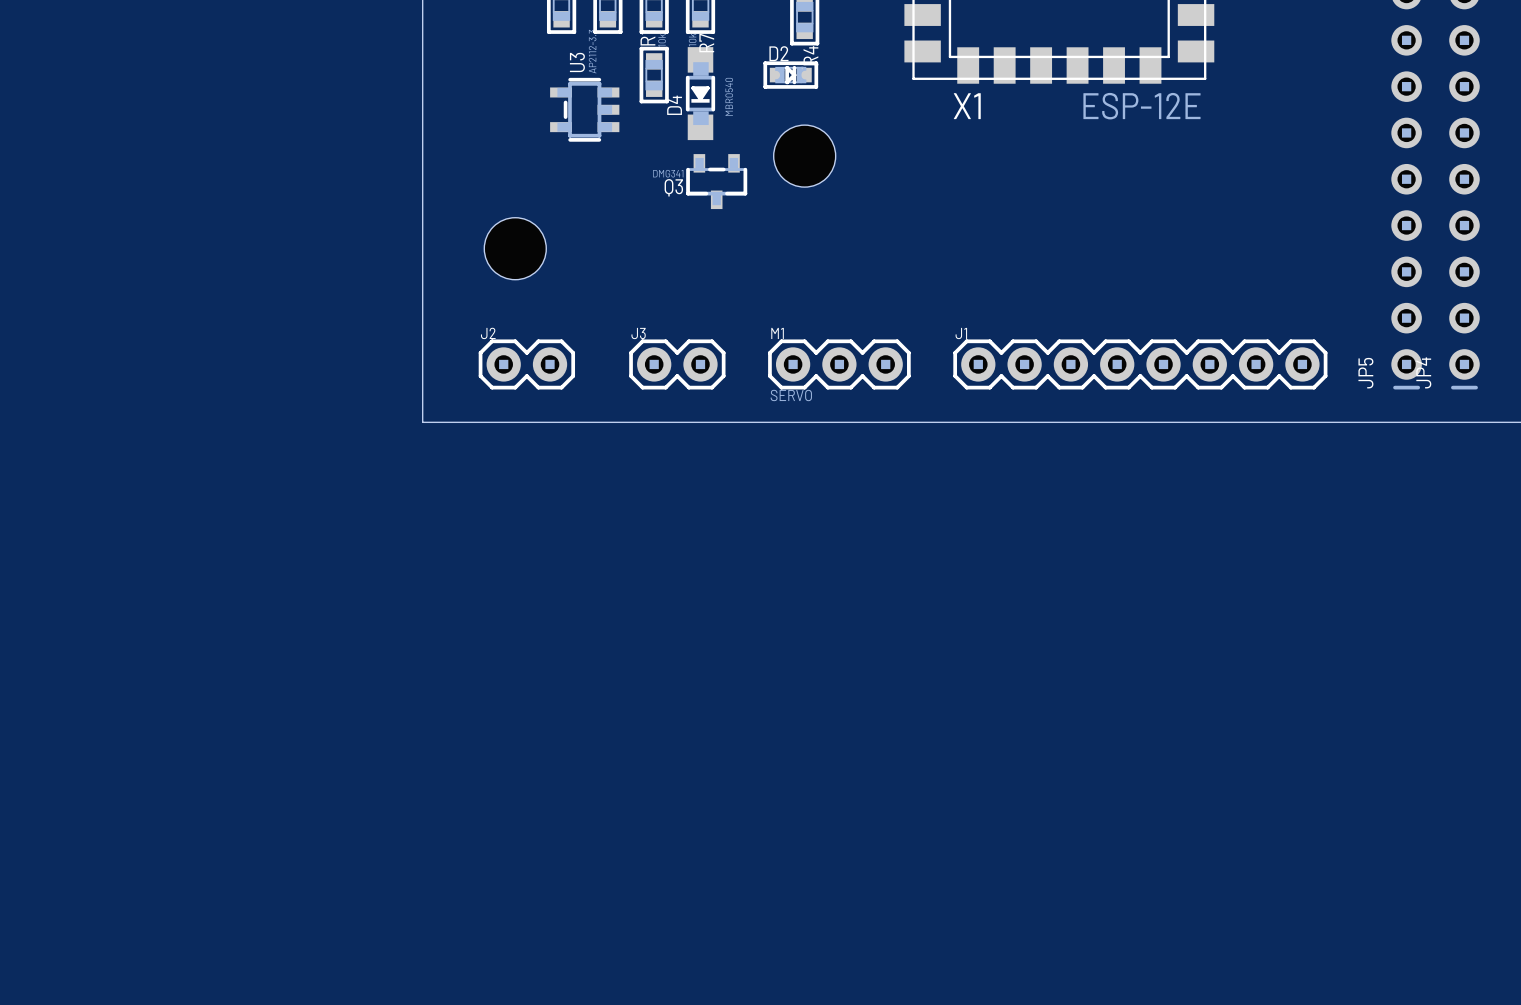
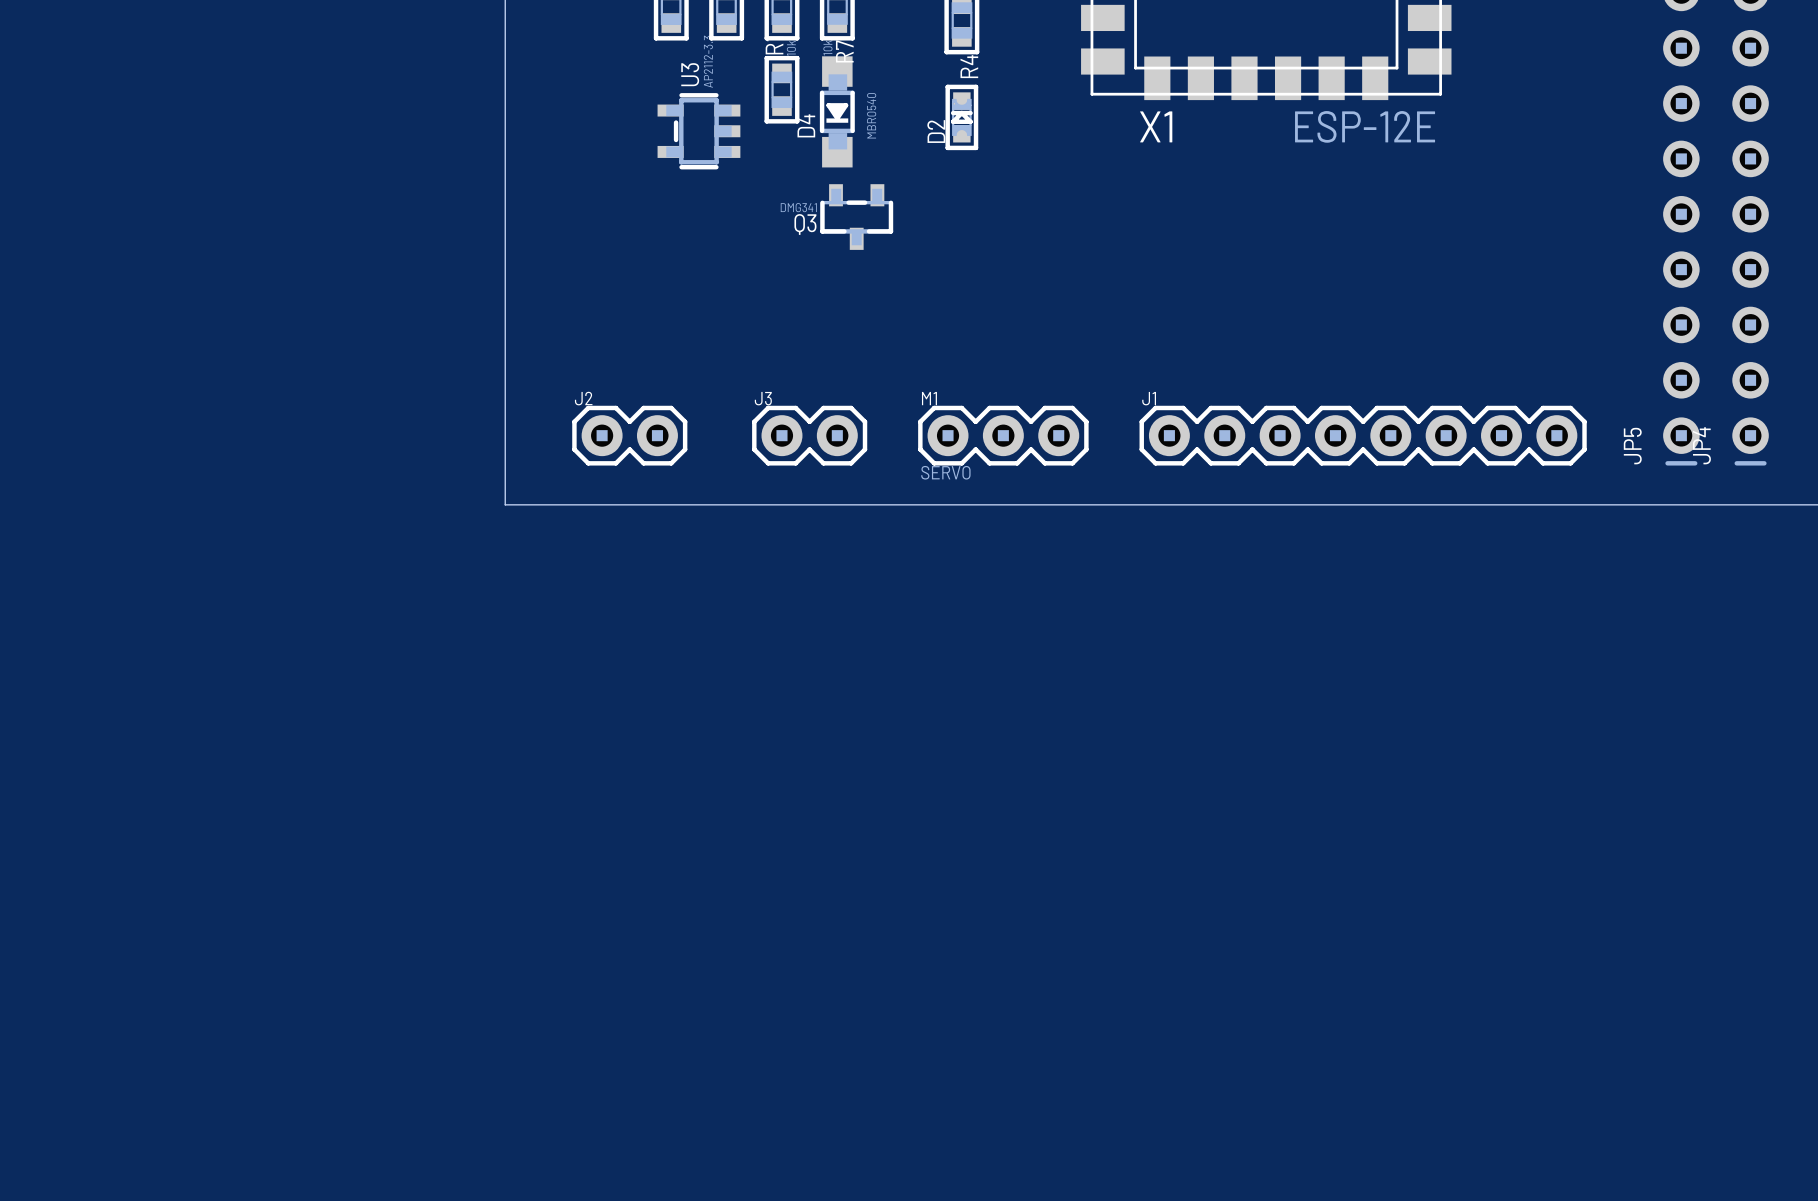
D2 rotation: 0° (790, 75) -> 90° counterclockwise (961, 117)
hole: (804, 156) -> none
hole: (515, 248) -> none

